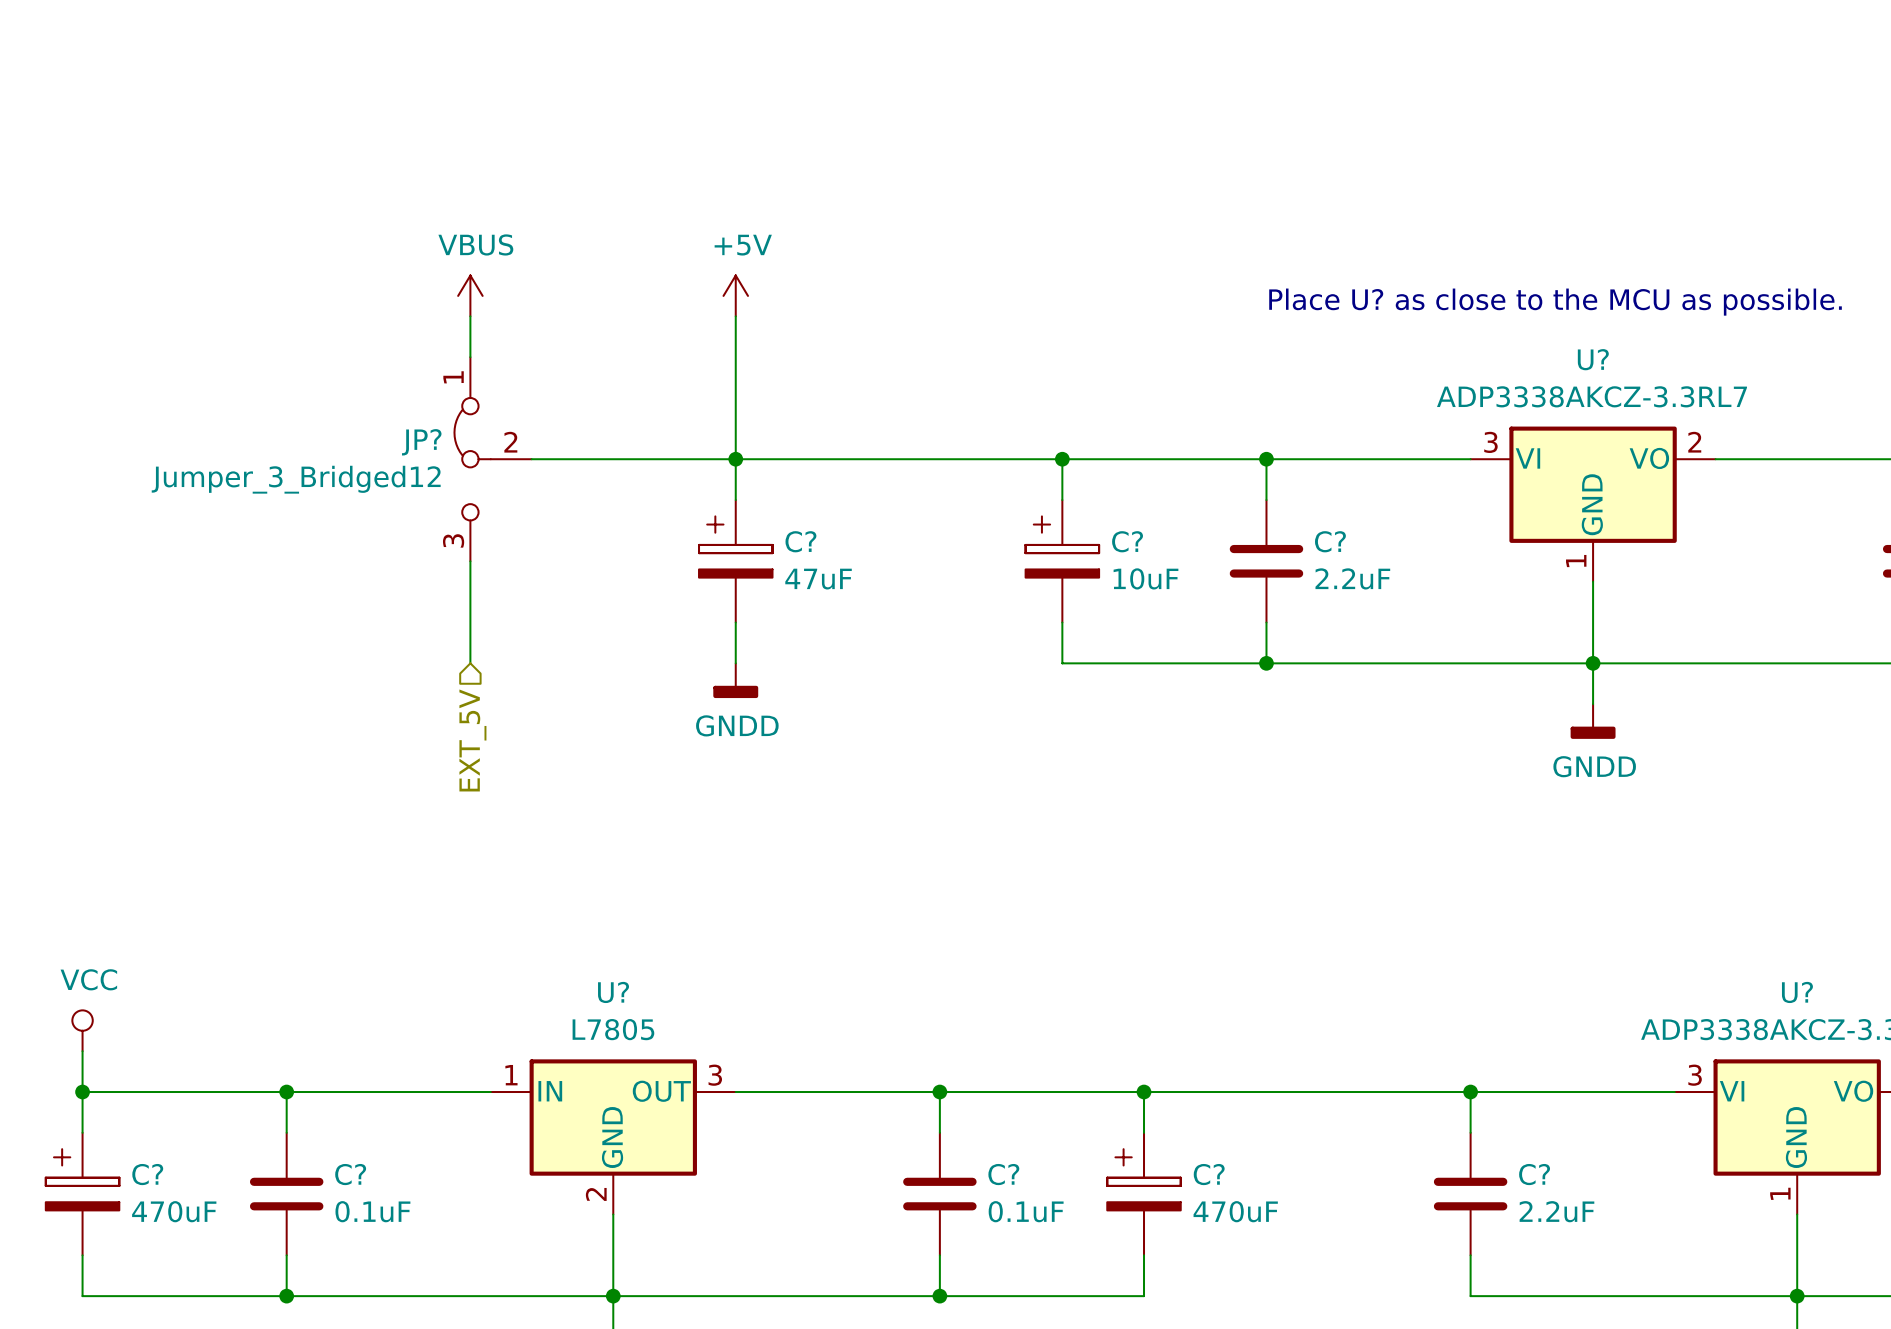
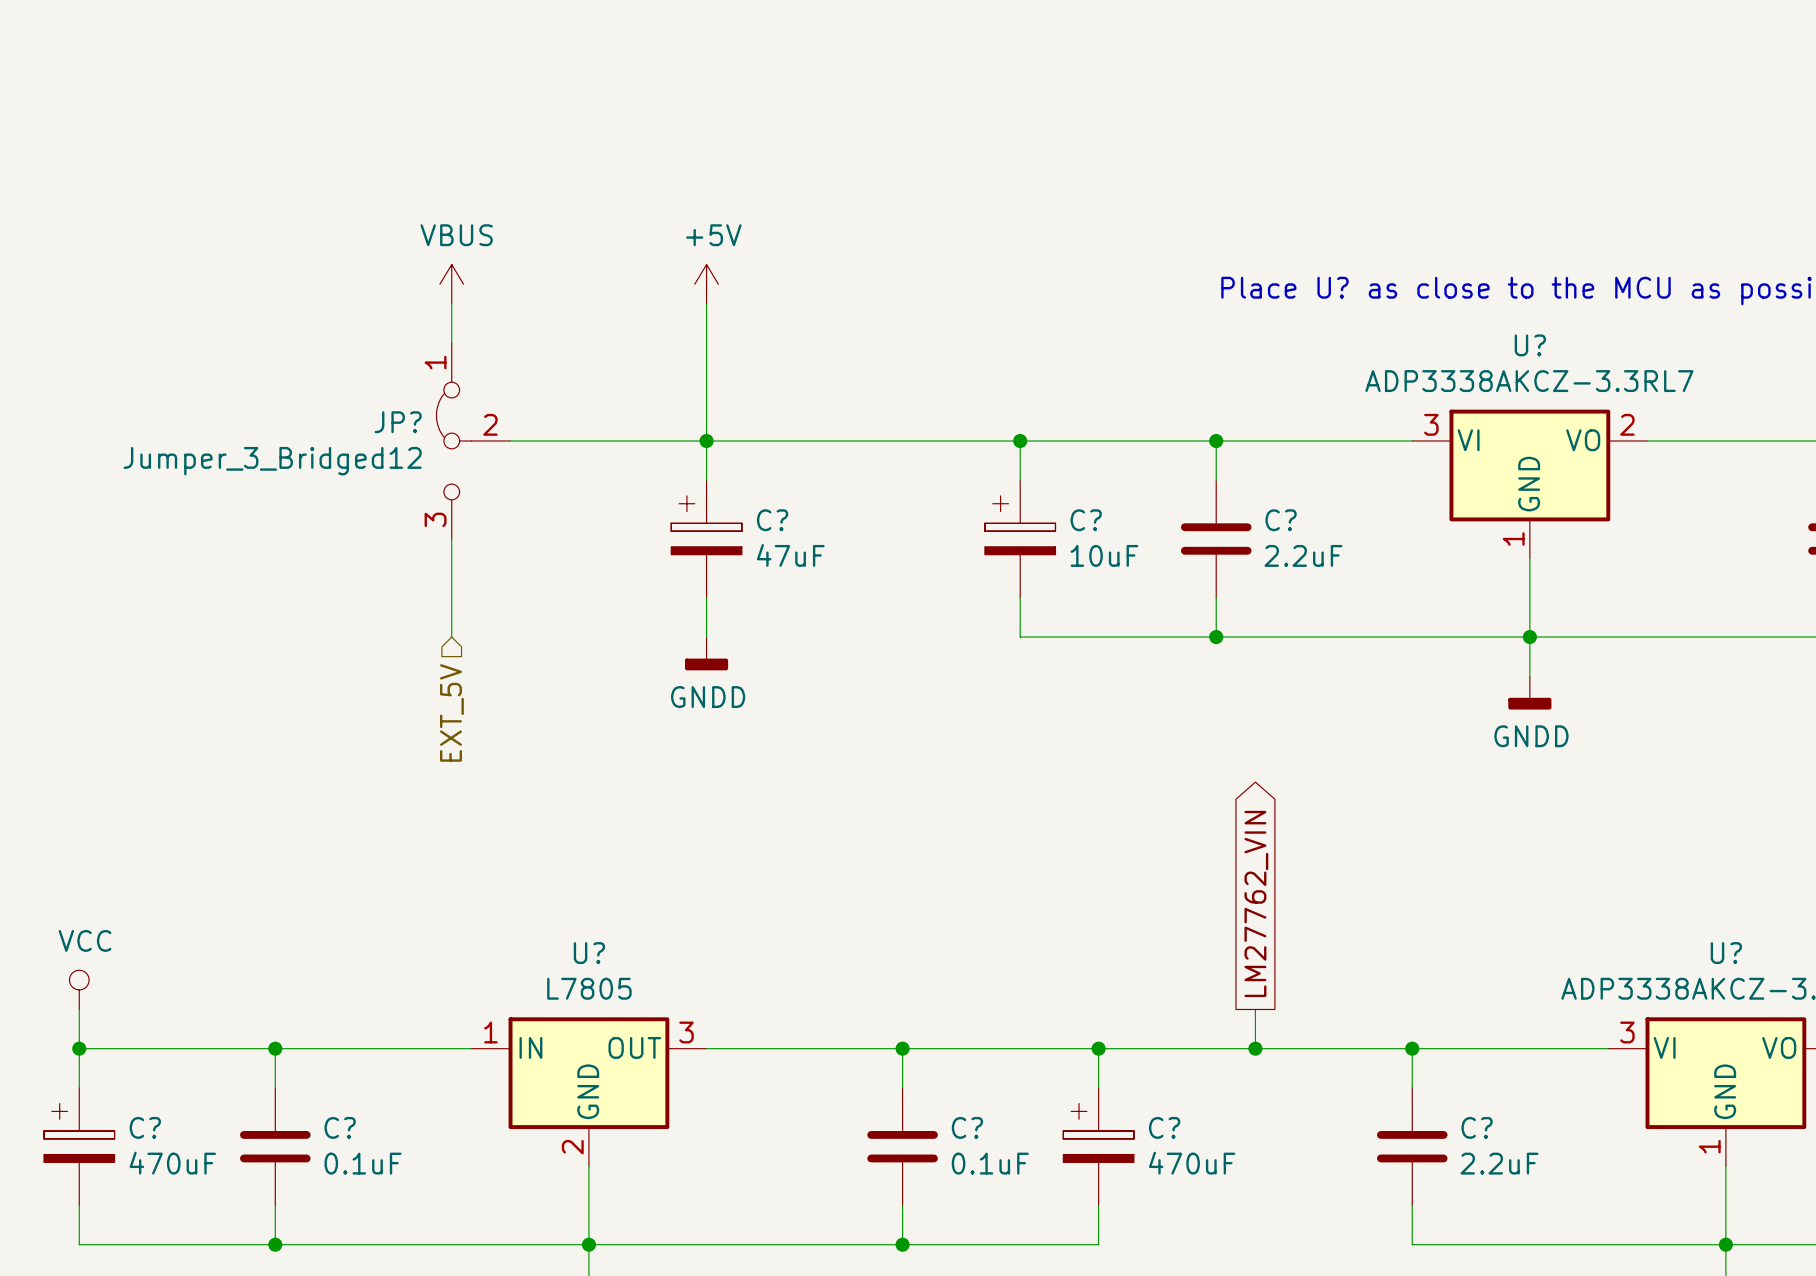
global label: none -> LM27762_VIN (1256, 903)
wire: none -> (1255, 1009) (1255, 1048)
junction: none -> (1255, 1048)

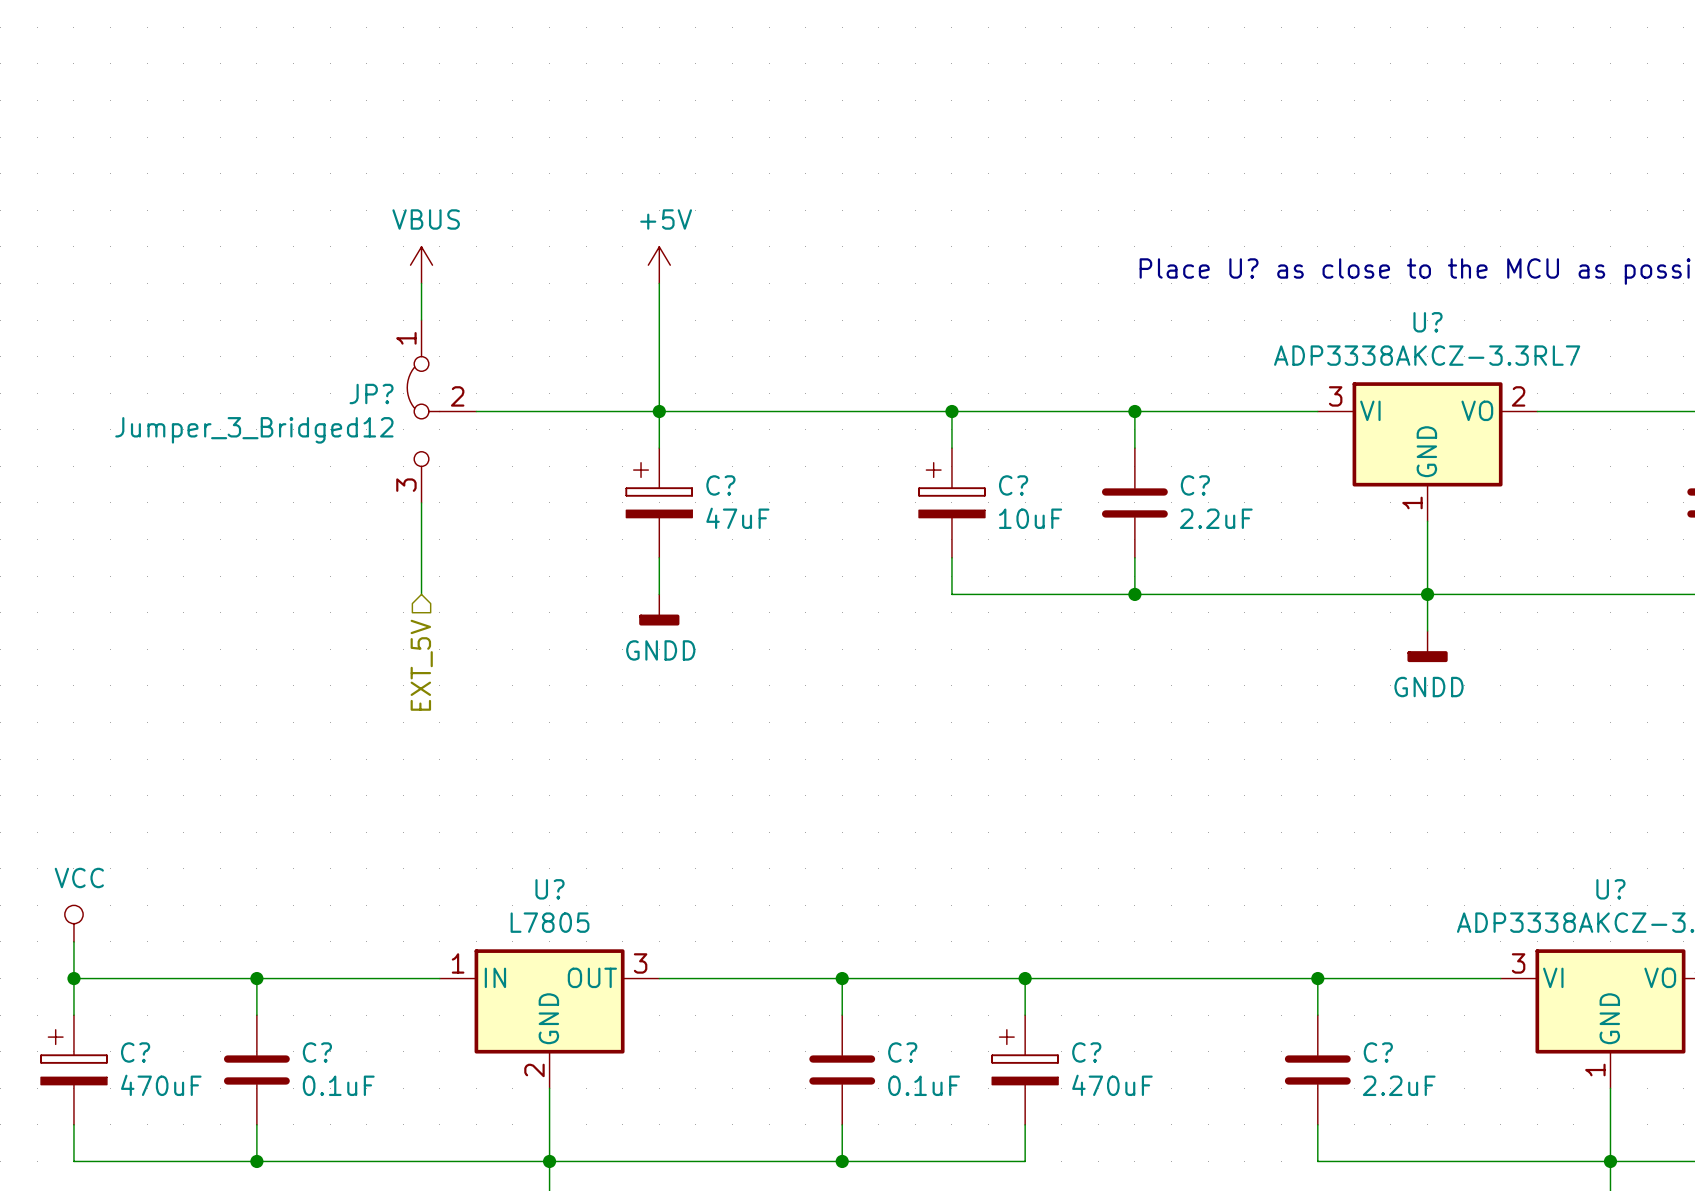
global label: LM27762_VIN (1256, 903) -> none
wire: (1255, 1009) (1255, 1048) -> none
junction: (1255, 1048) -> none

